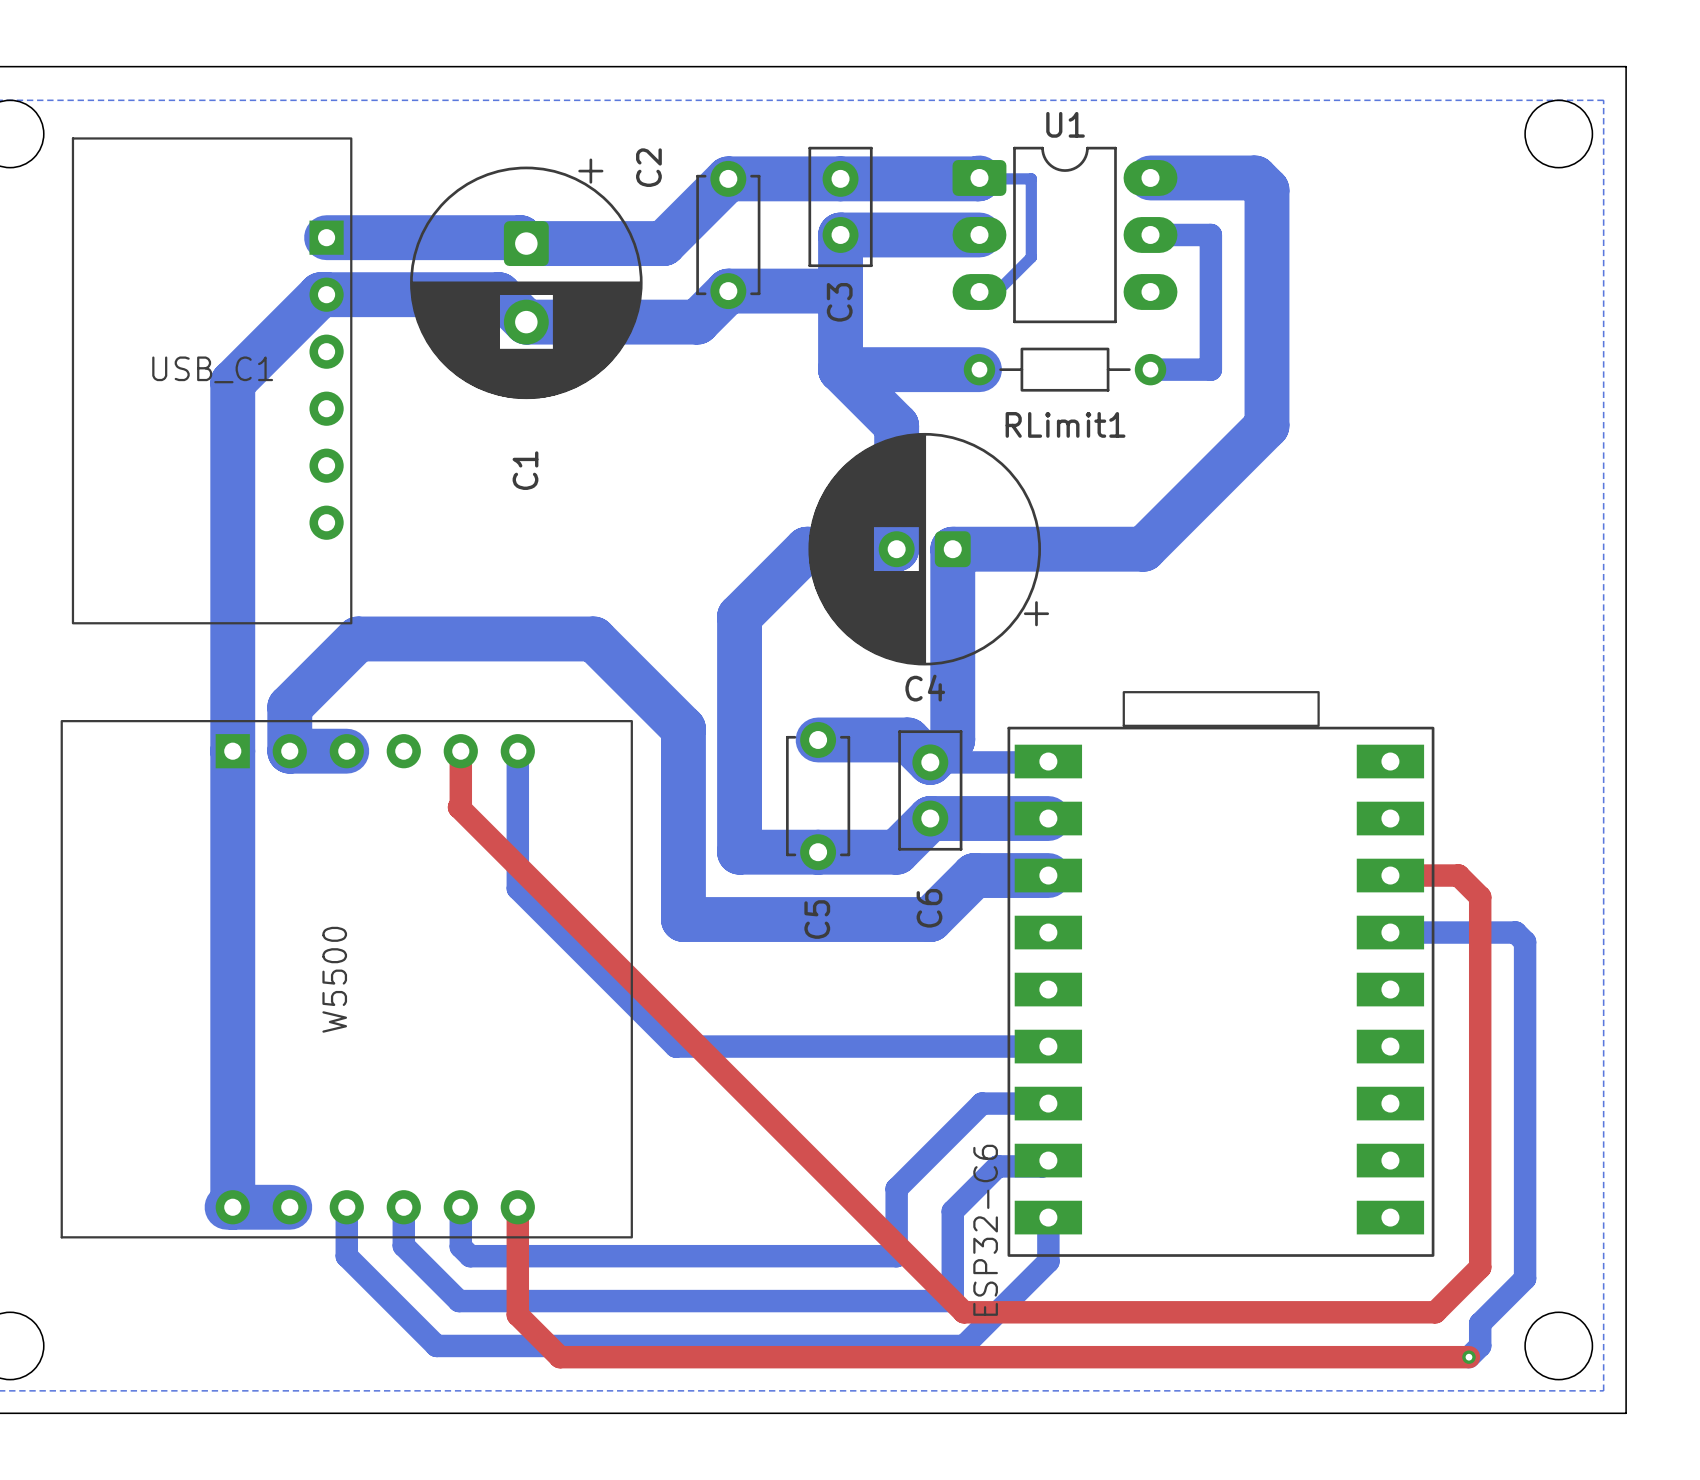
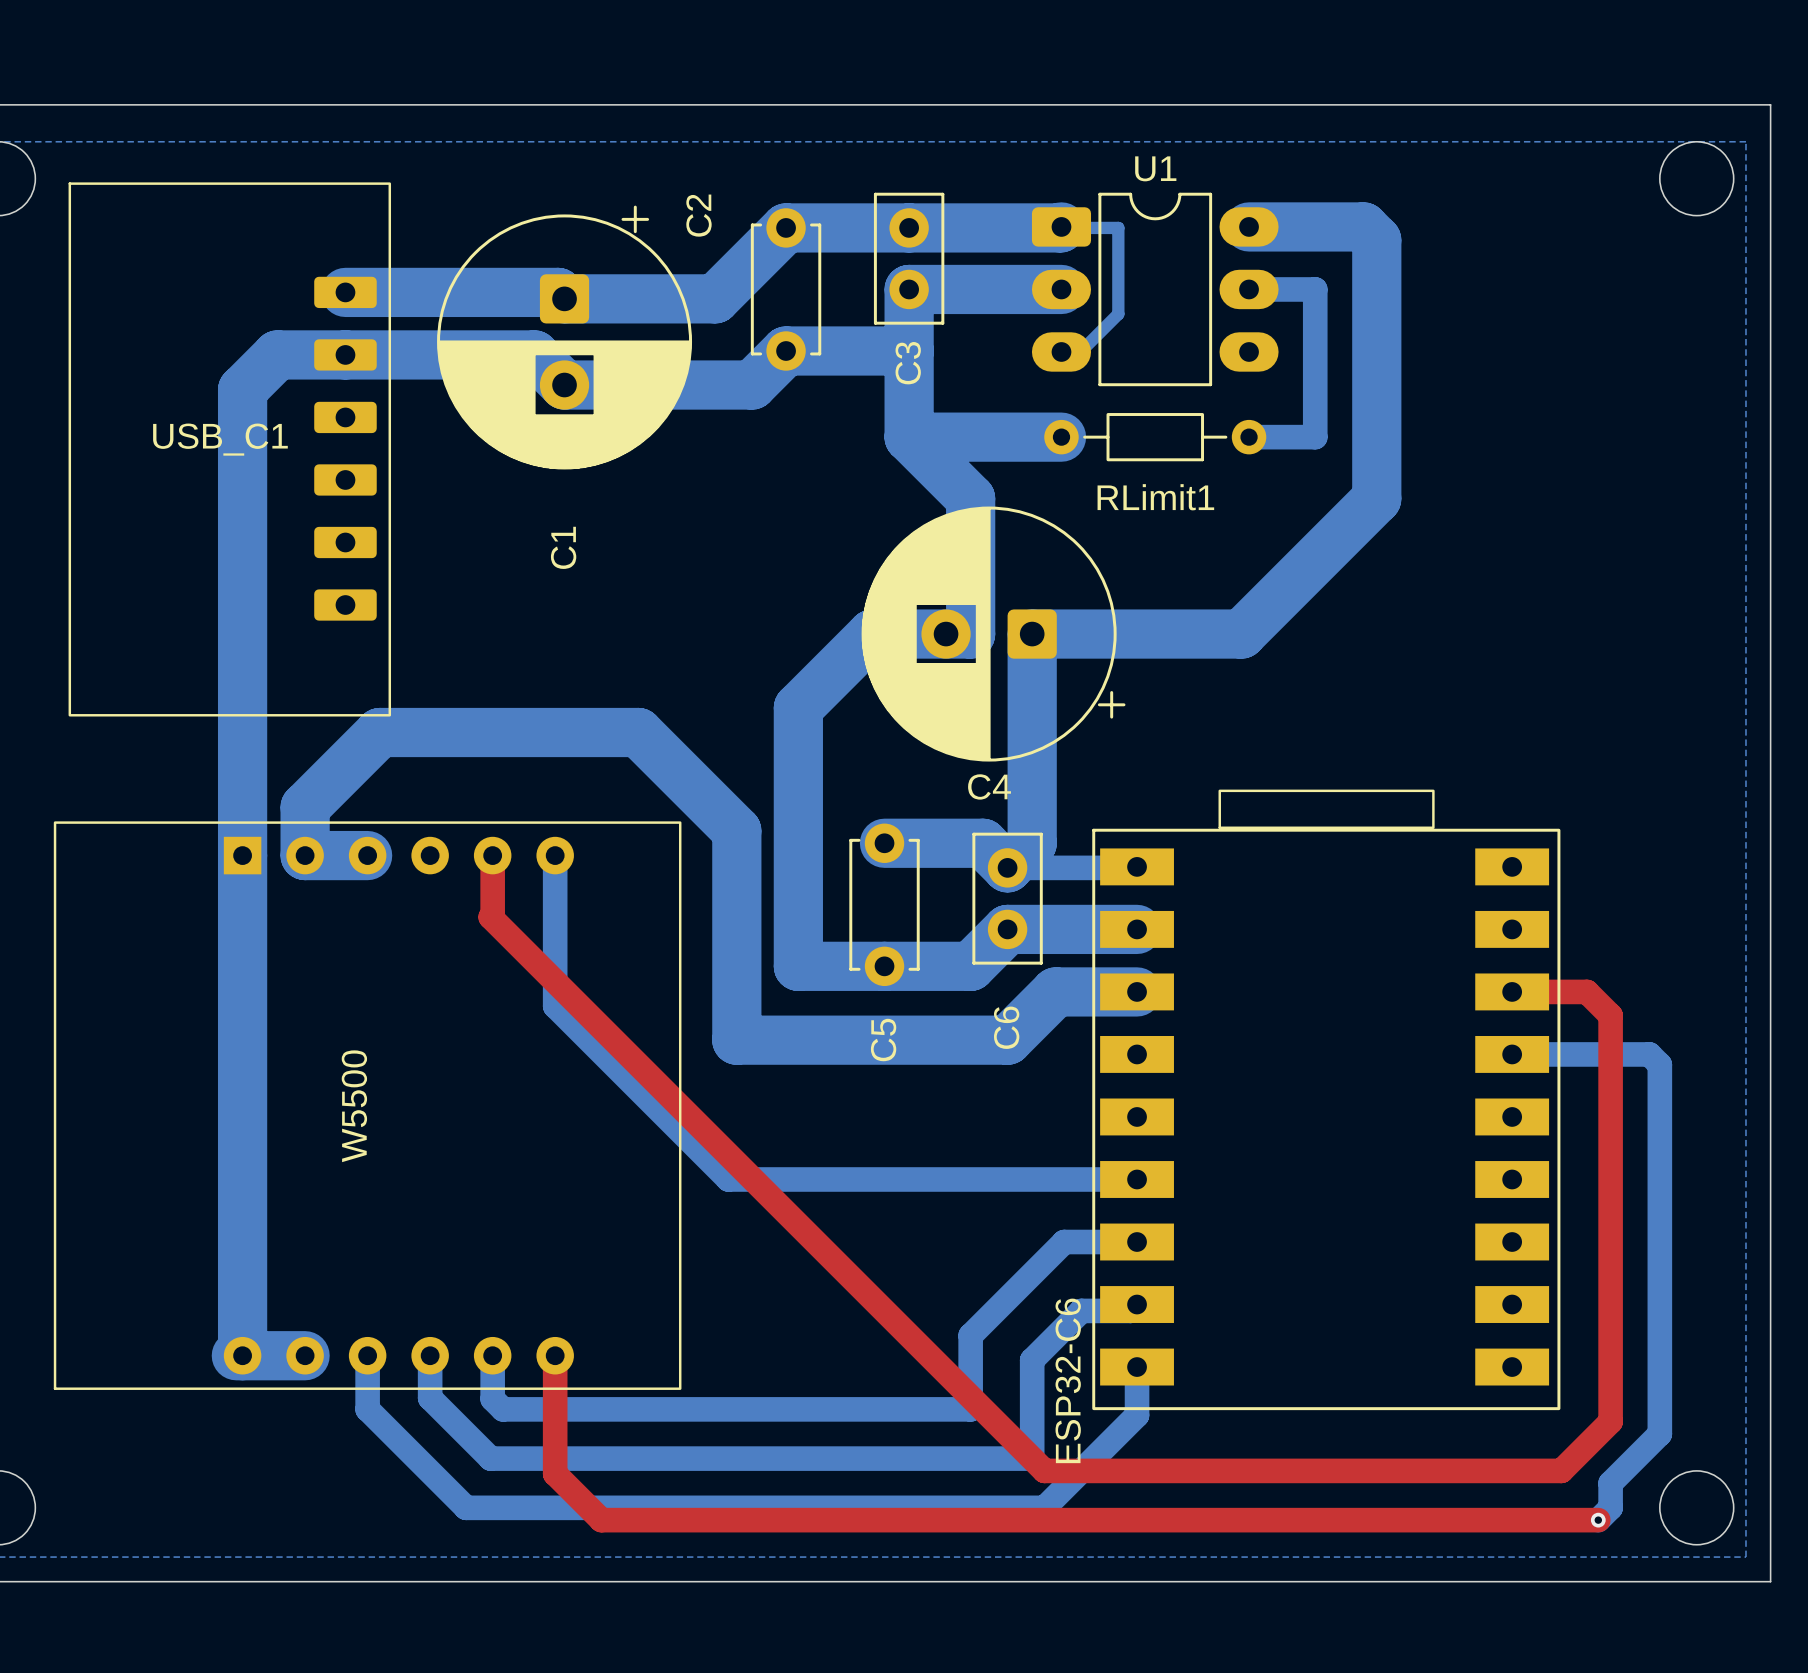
USB_C1 footprint: [71, 137, 353, 625] -> [68, 182, 392, 717]
bottom track: (320, 294) (232, 382) -> (339, 354) (277, 354) (242, 389) (242, 451)
C4 footprint: [808, 432, 1050, 666] -> [861, 506, 1126, 762]

